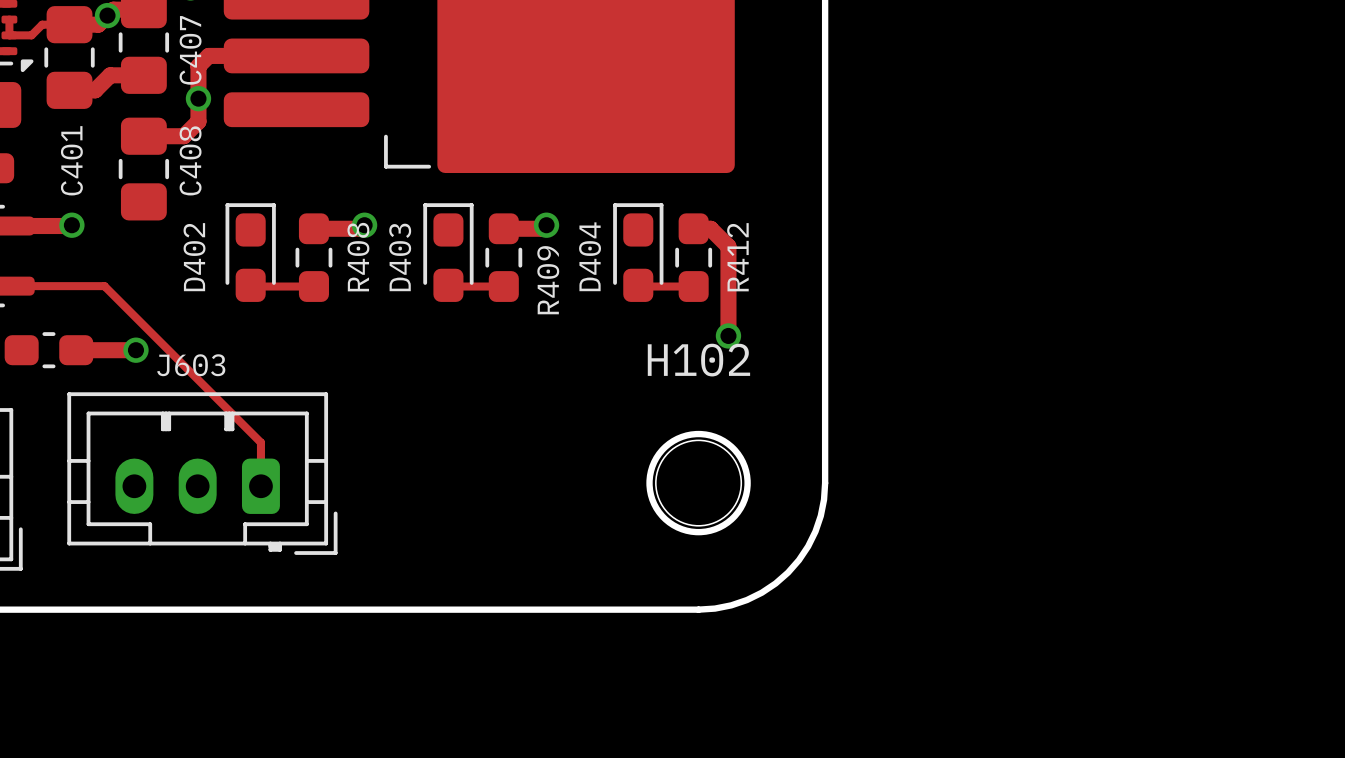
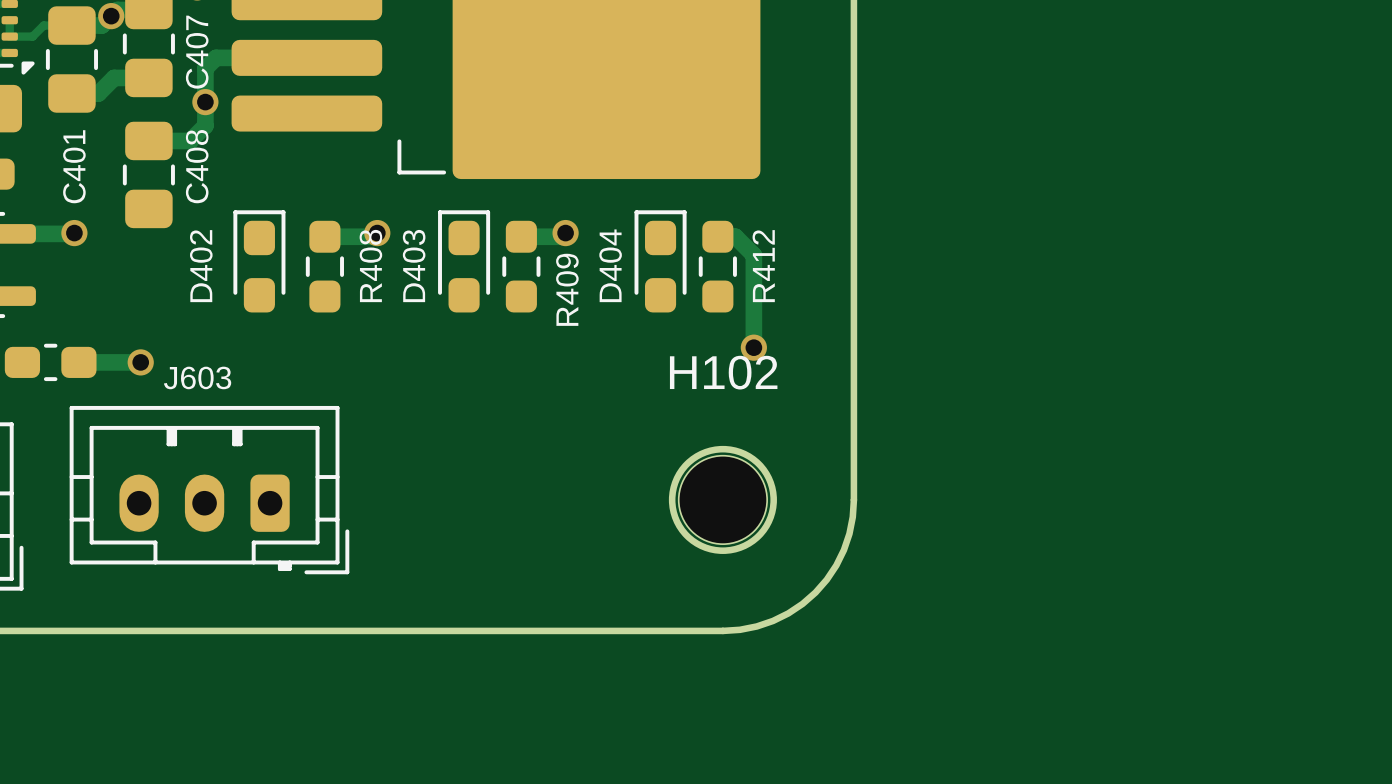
track: (250, 285) (313, 286) -> none
track: (448, 285) (503, 286) -> none
track: (638, 285) (693, 286) -> none
track: (13, 286) (104, 286) (260, 442) (260, 486) -> none

